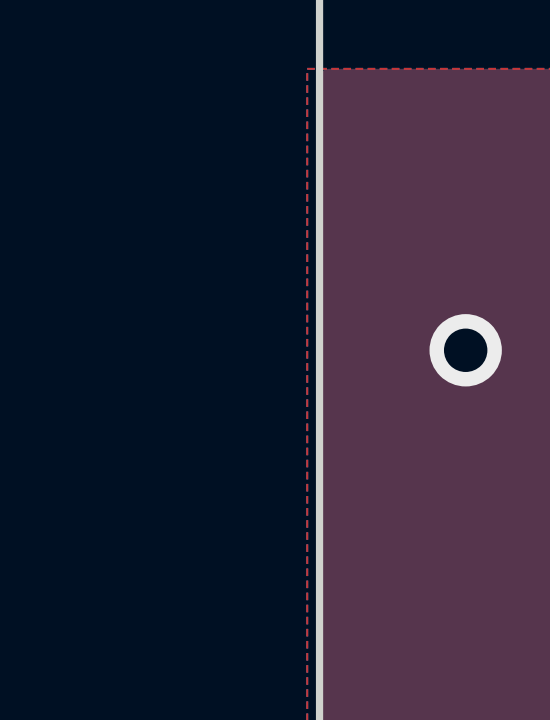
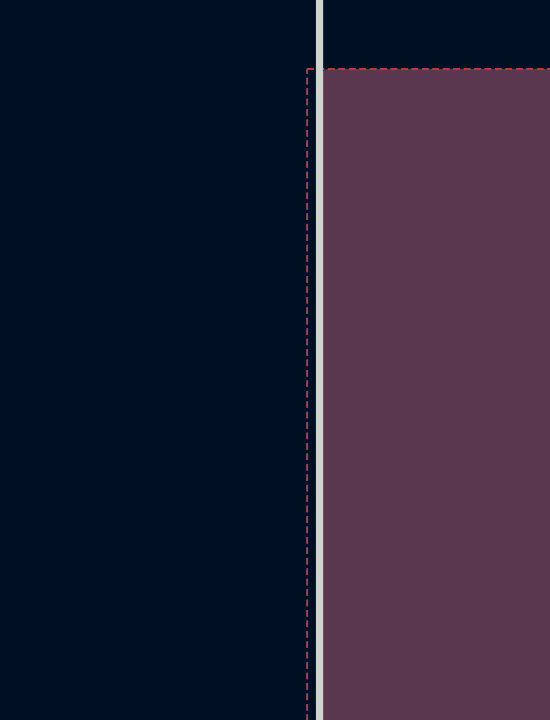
via: (465, 350) -> none

